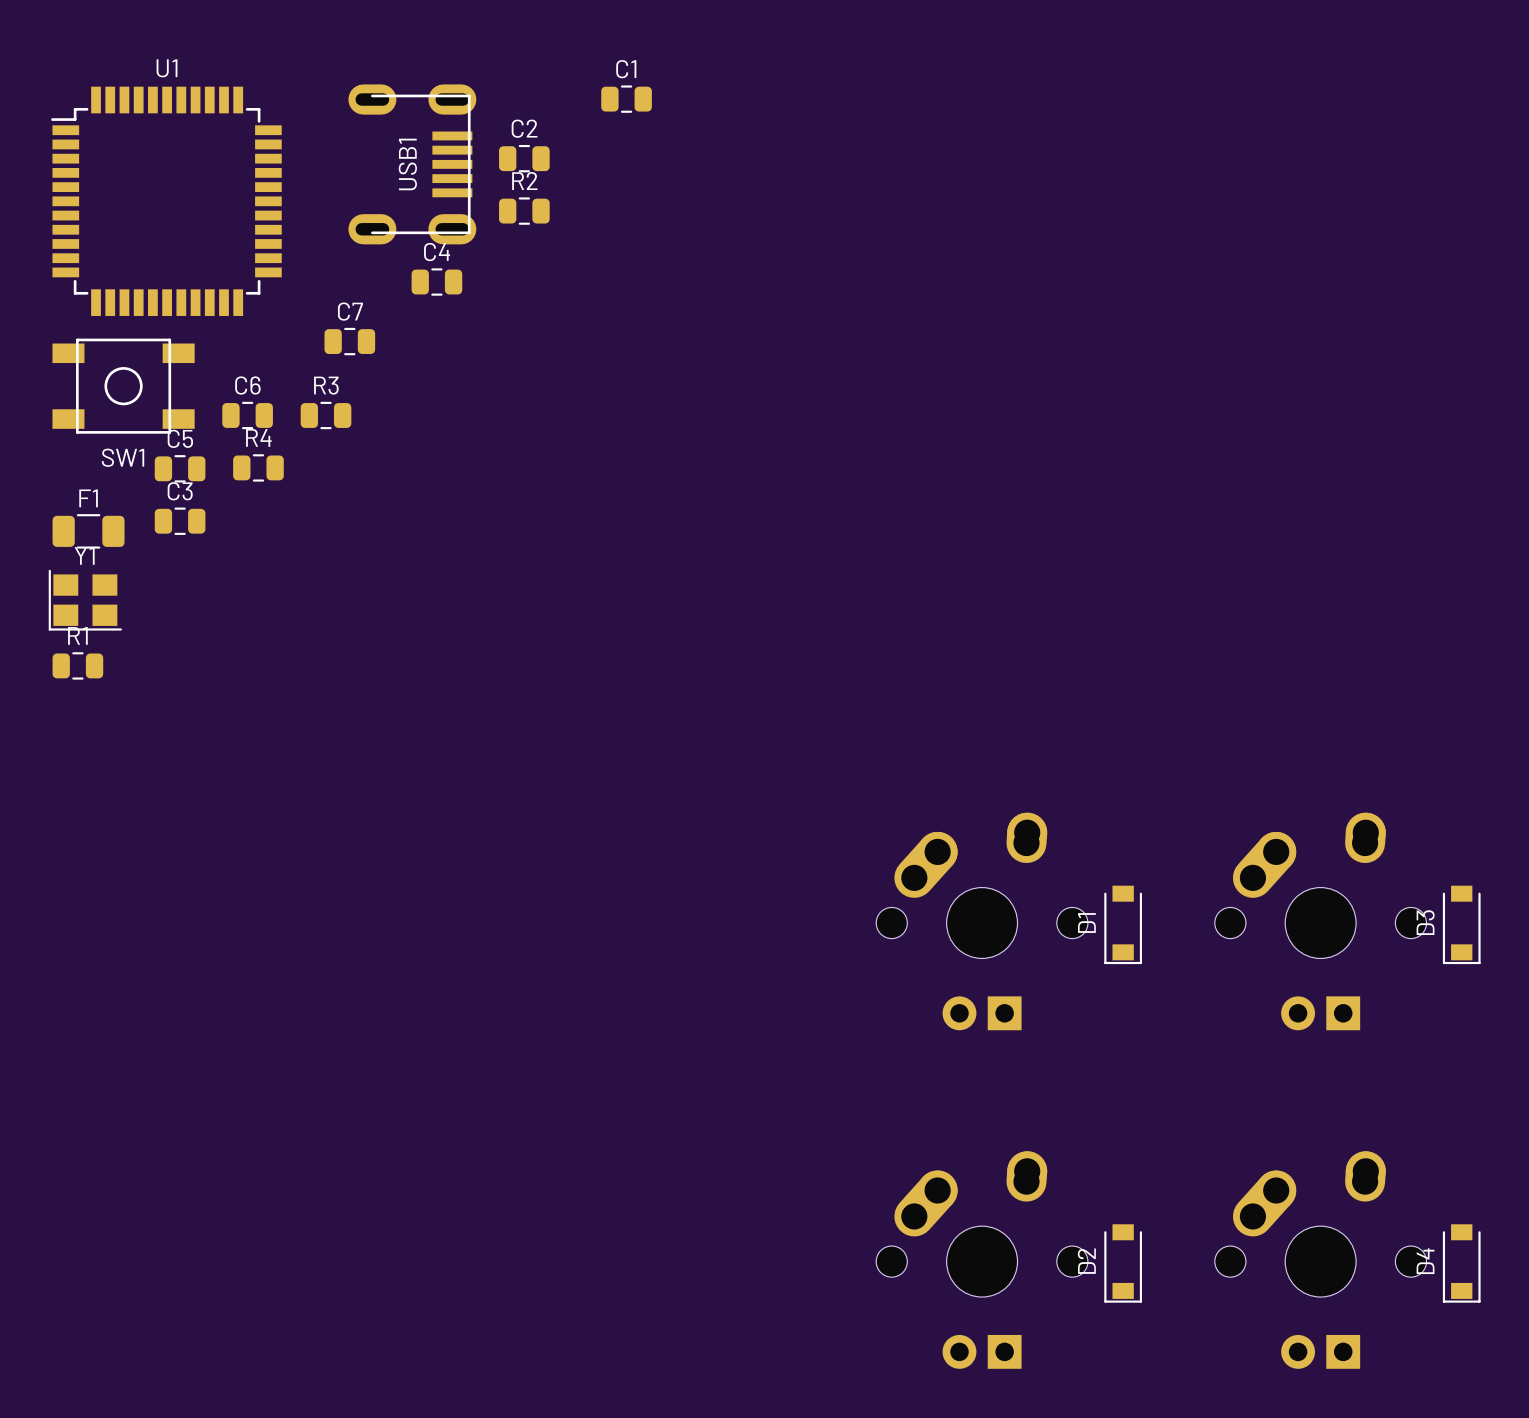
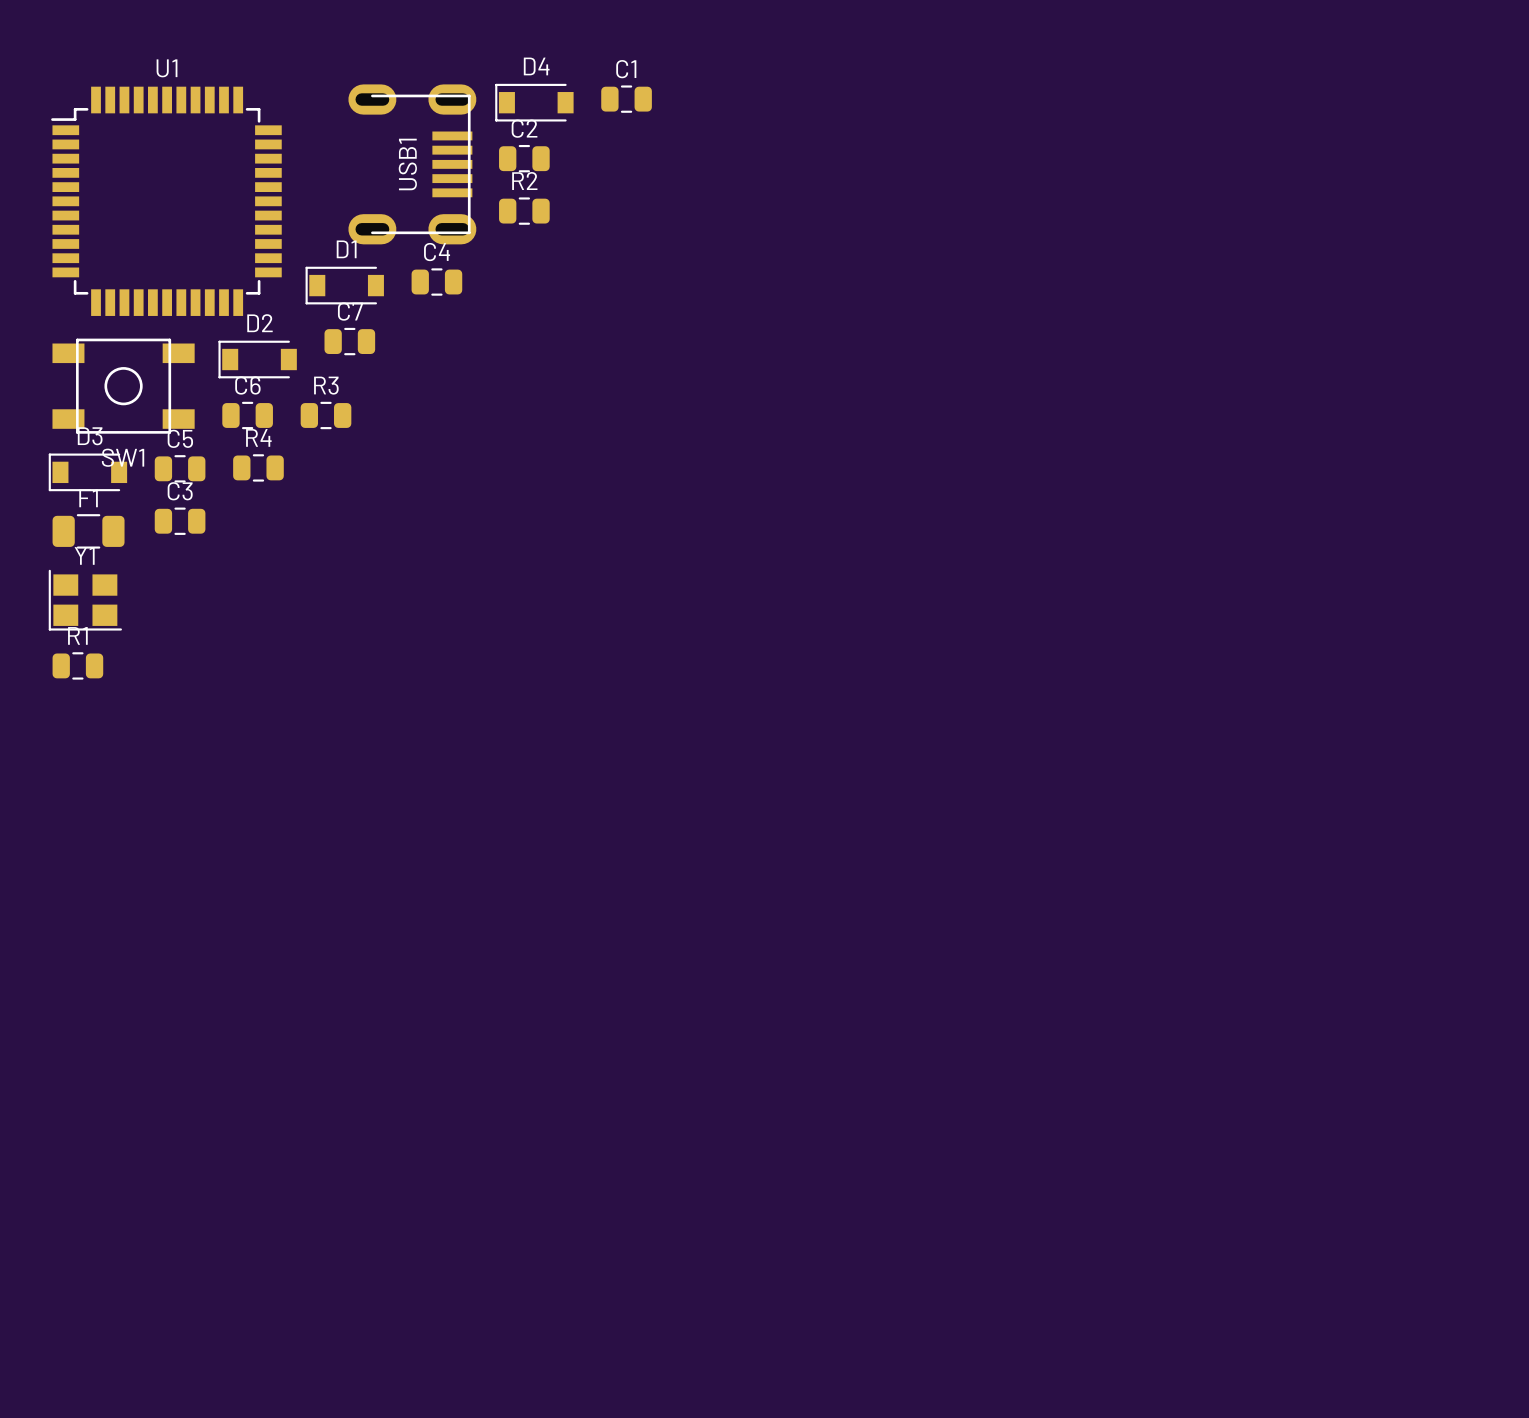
part: (982, 921) -> none
part: (1320, 921) -> none
D1 rotation: 0° (1123, 924) -> 90° clockwise (344, 285)
D1 position: (1123, 924) -> (344, 285)
D3 rotation: 0° (1461, 924) -> 90° clockwise (87, 472)
D3 position: (1461, 924) -> (87, 472)
part: (982, 1260) -> none
part: (1320, 1260) -> none
D2 rotation: 0° (1123, 1263) -> 90° clockwise (257, 359)
D2 position: (1123, 1263) -> (257, 359)
D4 rotation: 0° (1461, 1263) -> 90° clockwise (534, 102)
D4 position: (1461, 1263) -> (534, 102)

